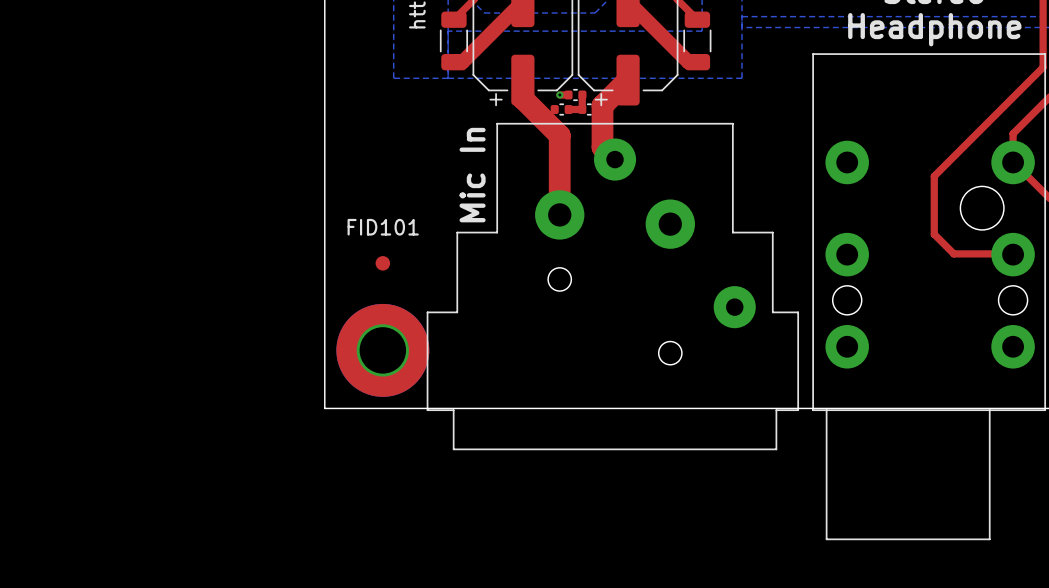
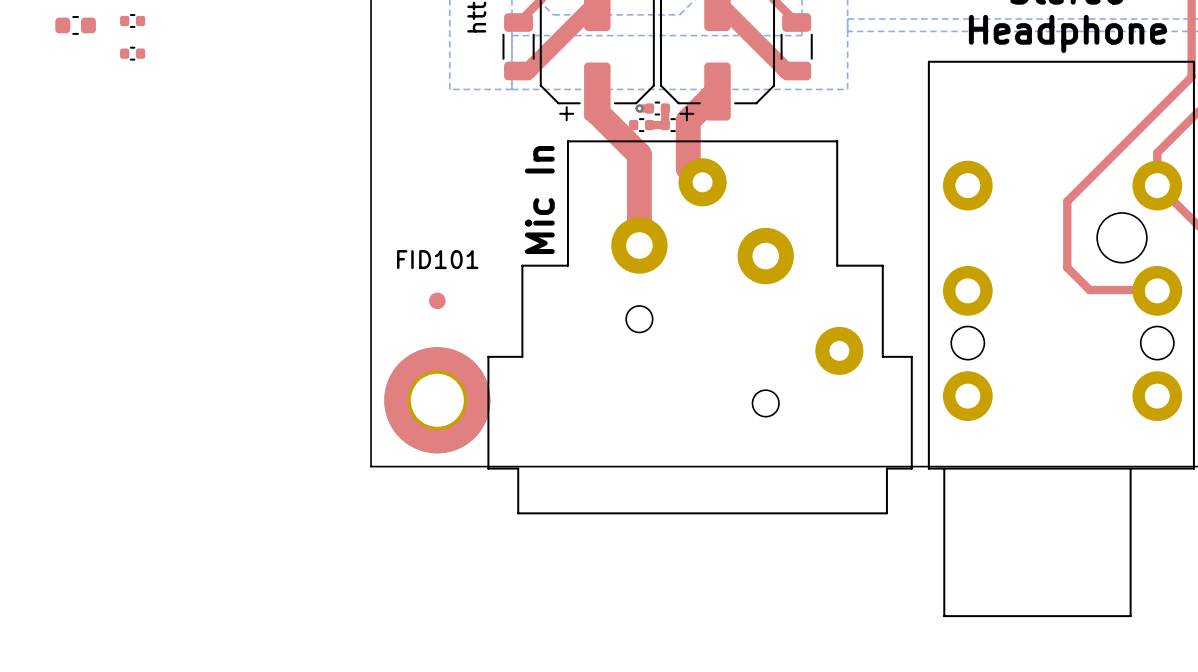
part: none -> (132, 20)
part: none -> (75, 25)
part: none -> (132, 53)

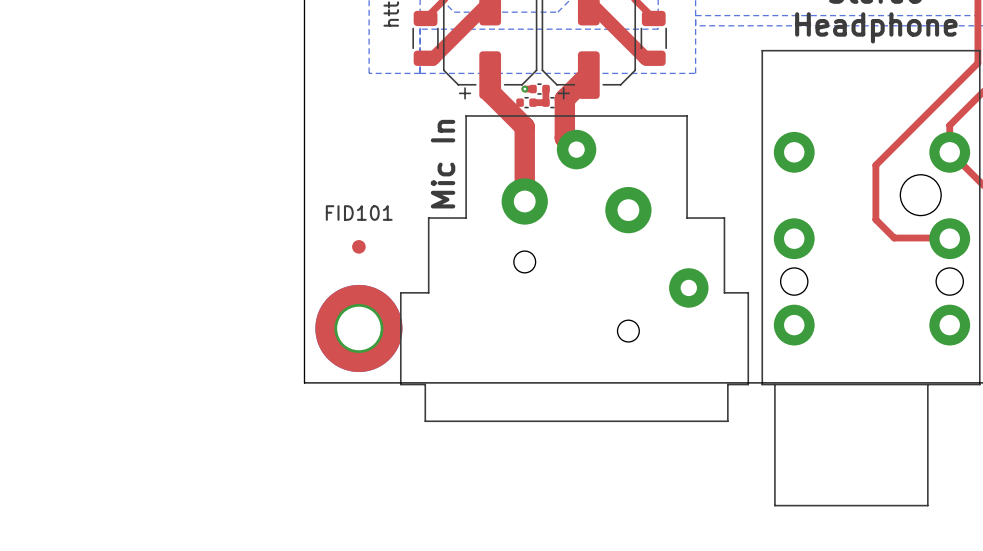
part: (132, 20) -> none
part: (75, 25) -> none
part: (132, 53) -> none

